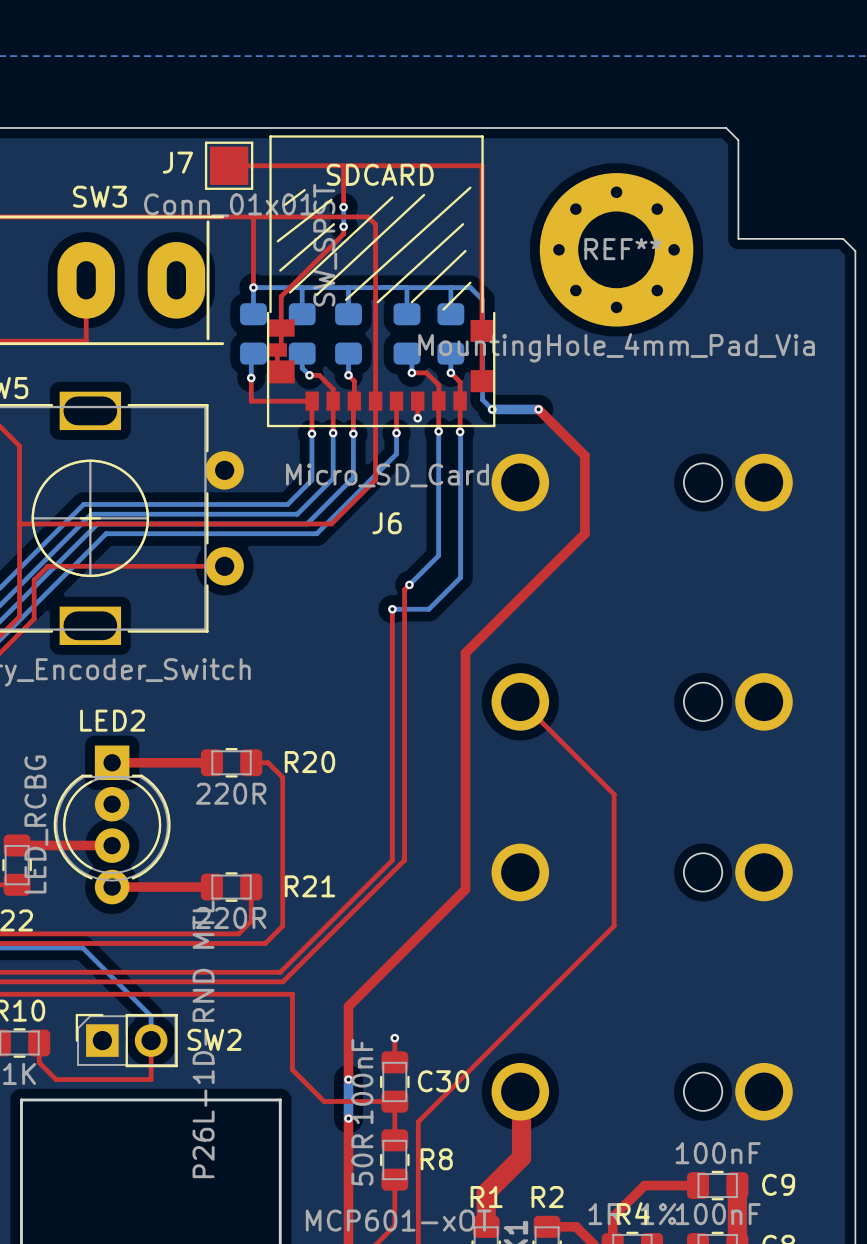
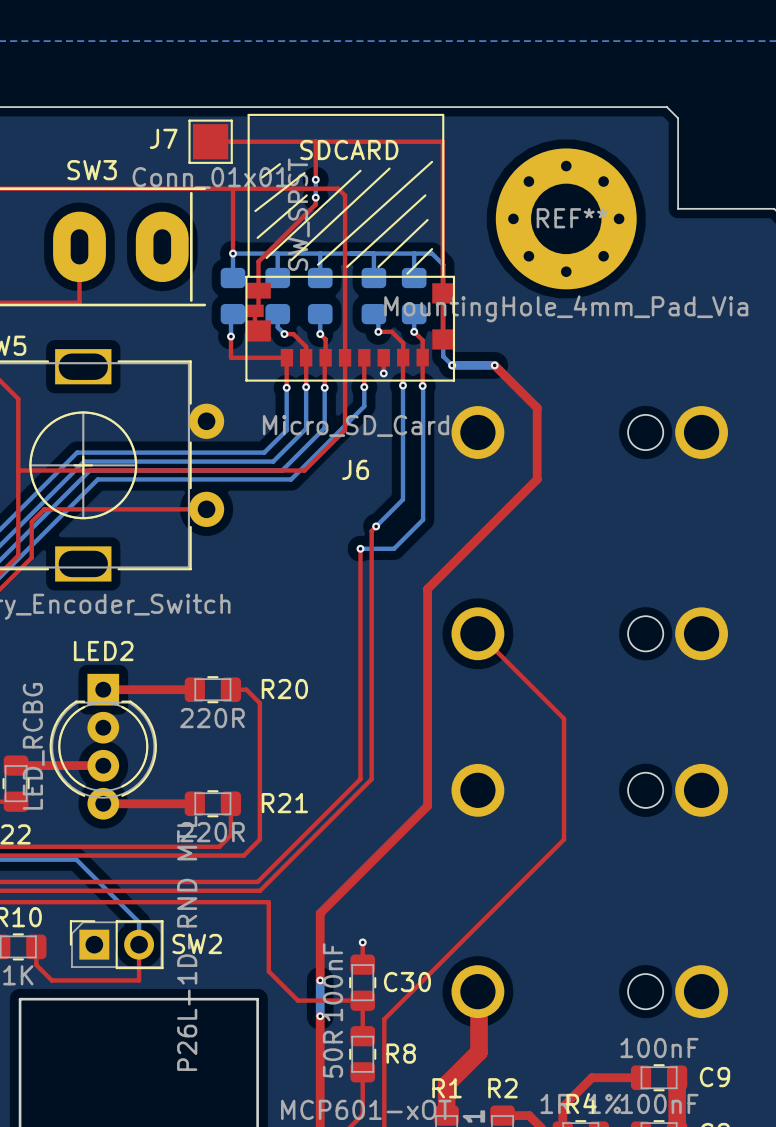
J6 footprint: [266, 311, 496, 428] -> [245, 275, 456, 382]

